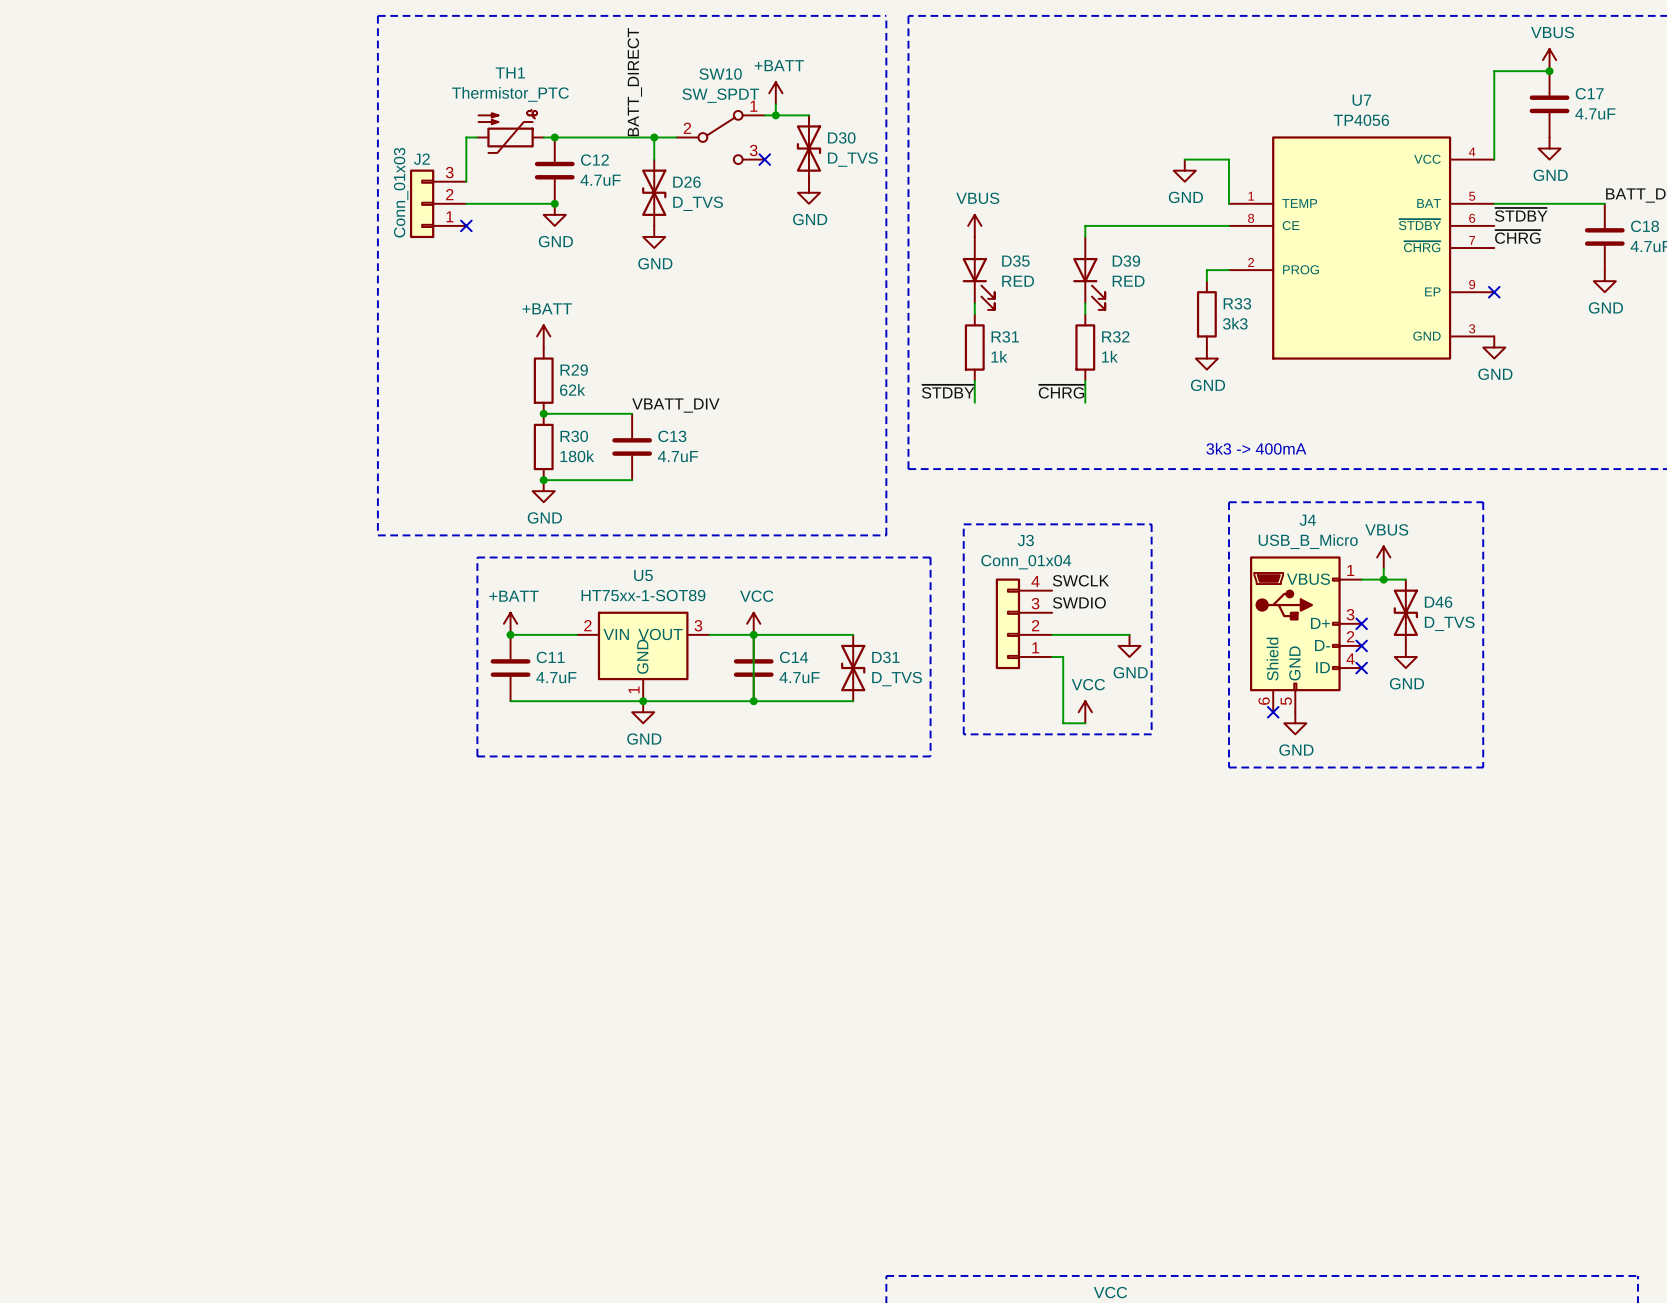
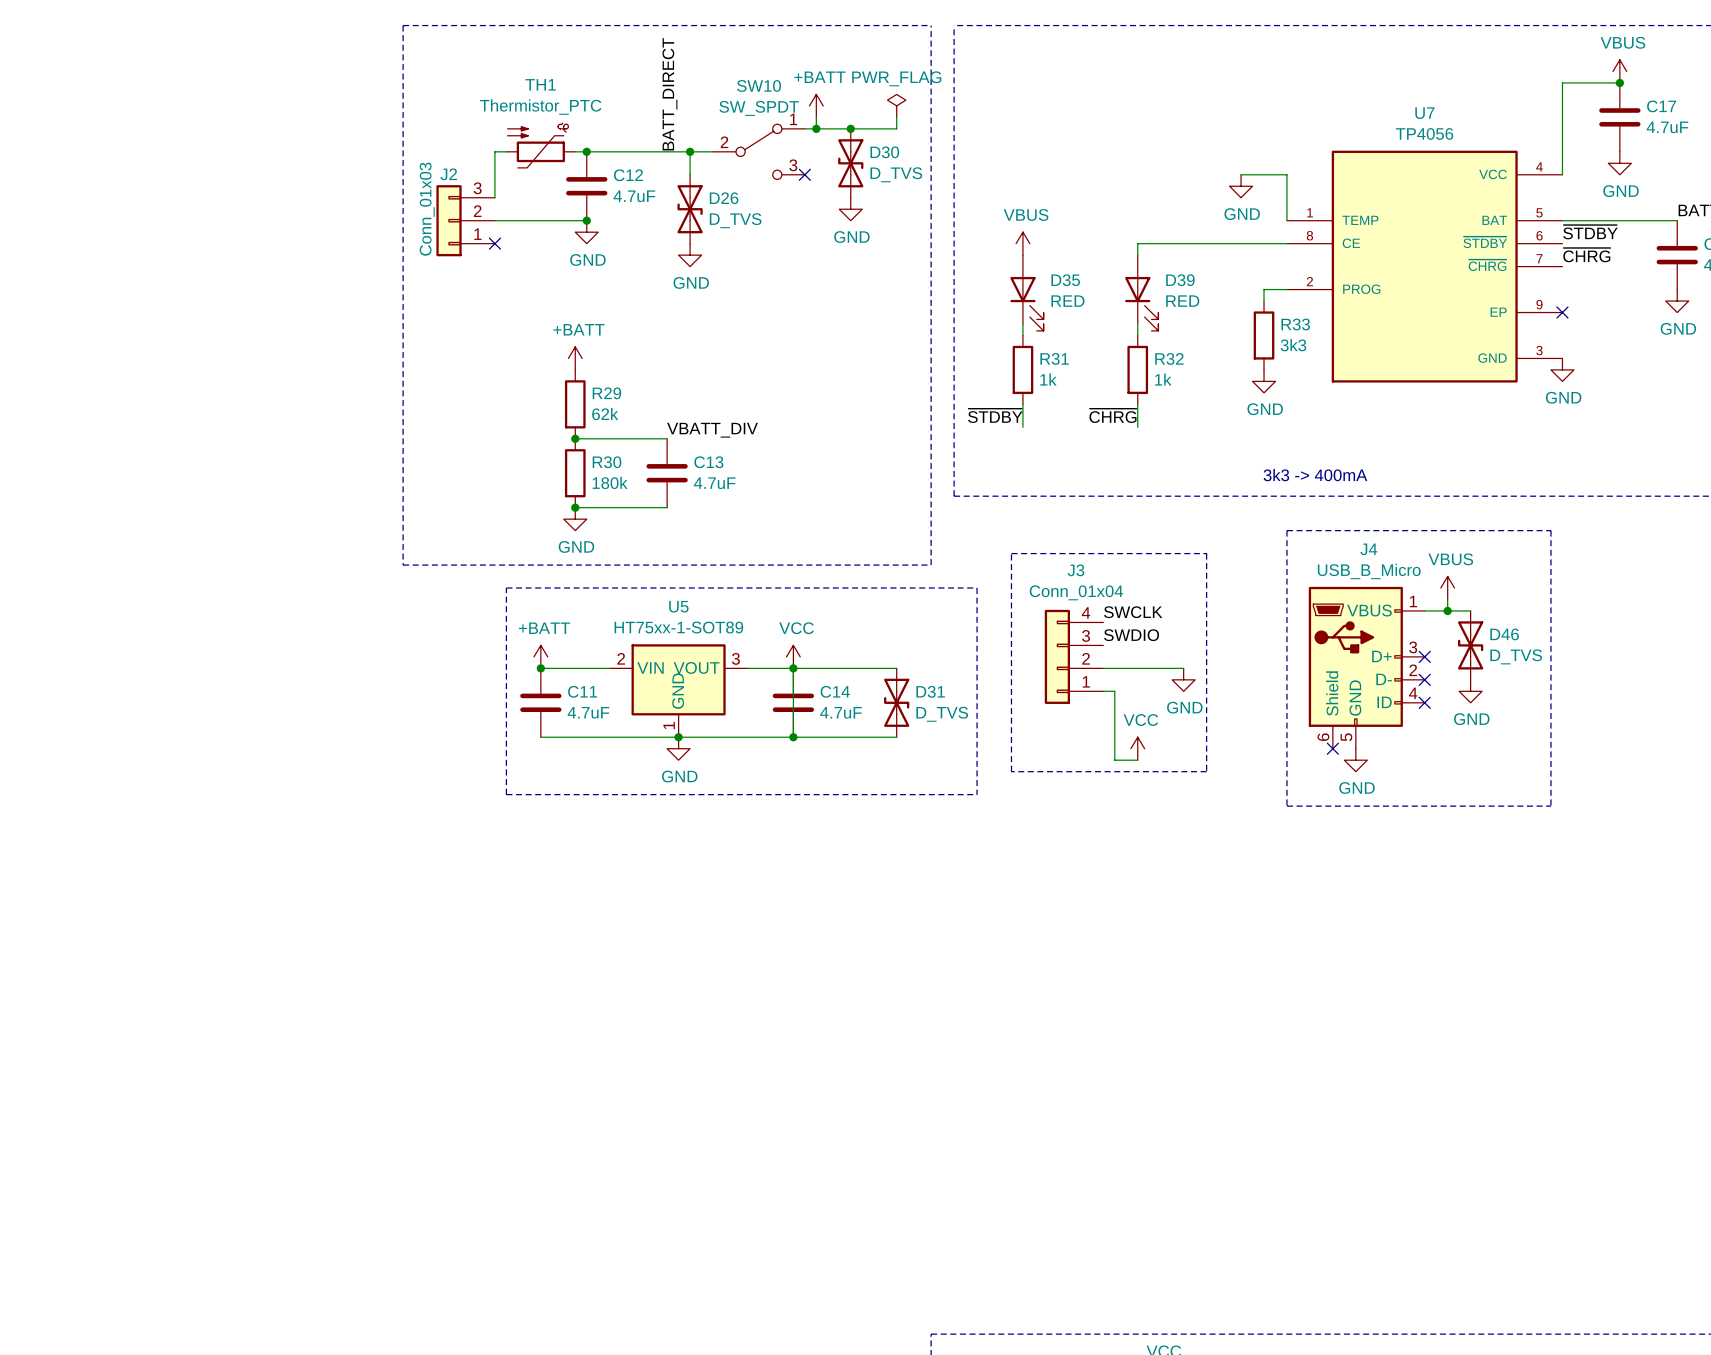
power symbol: none -> PWR_FLAG (896, 105)
wire: none -> (896, 117) (896, 128) (850, 128)
junction: none -> (850, 128)

